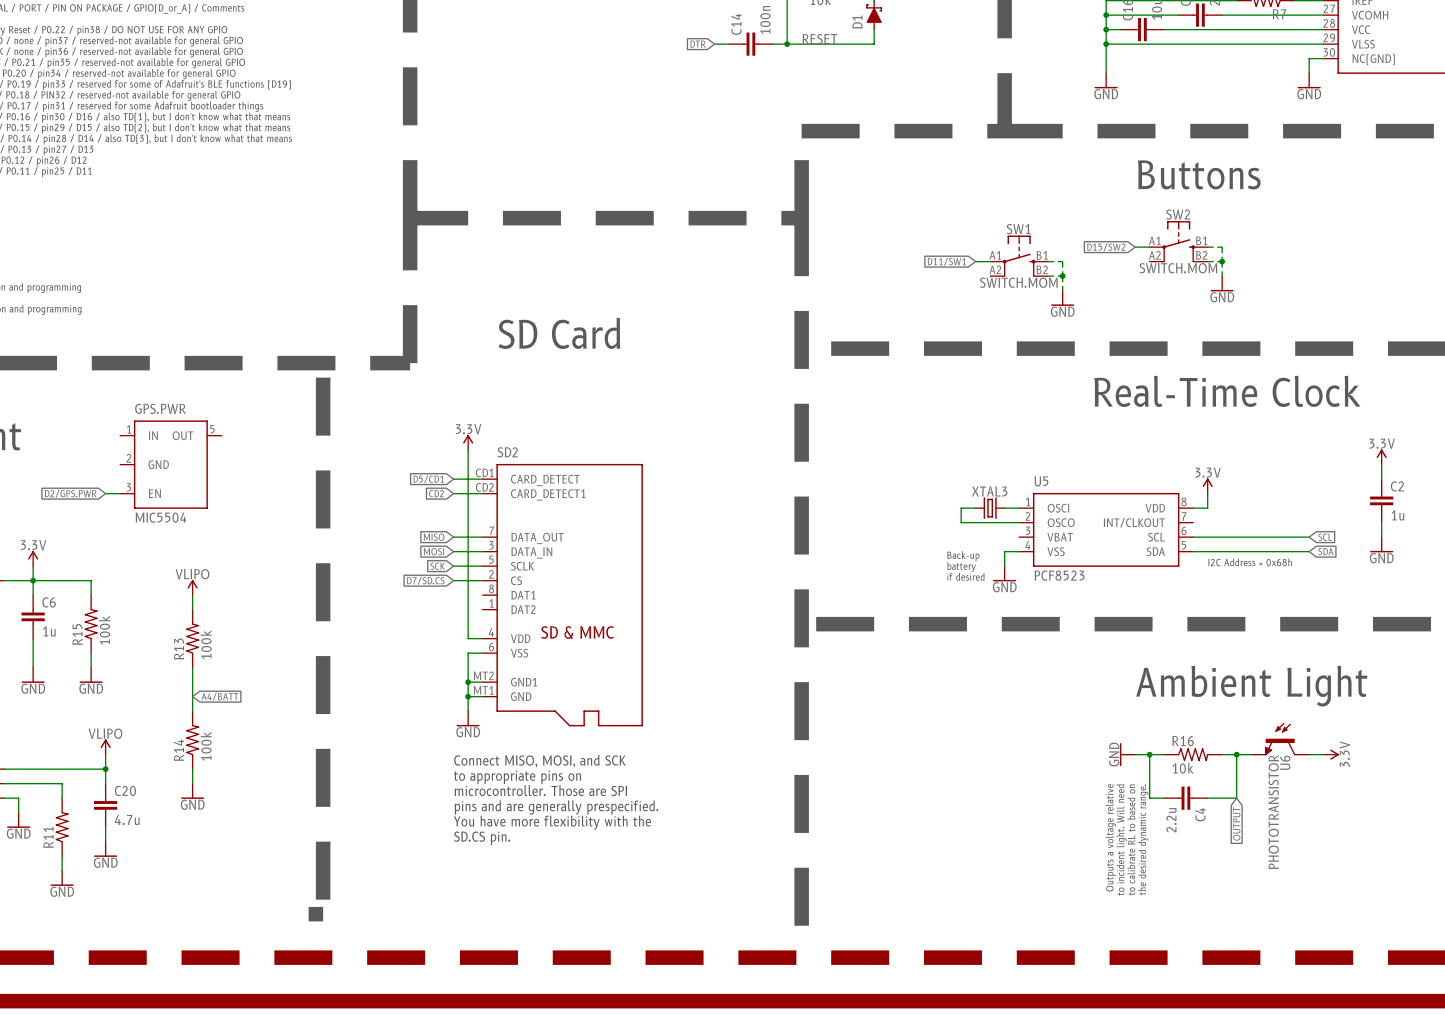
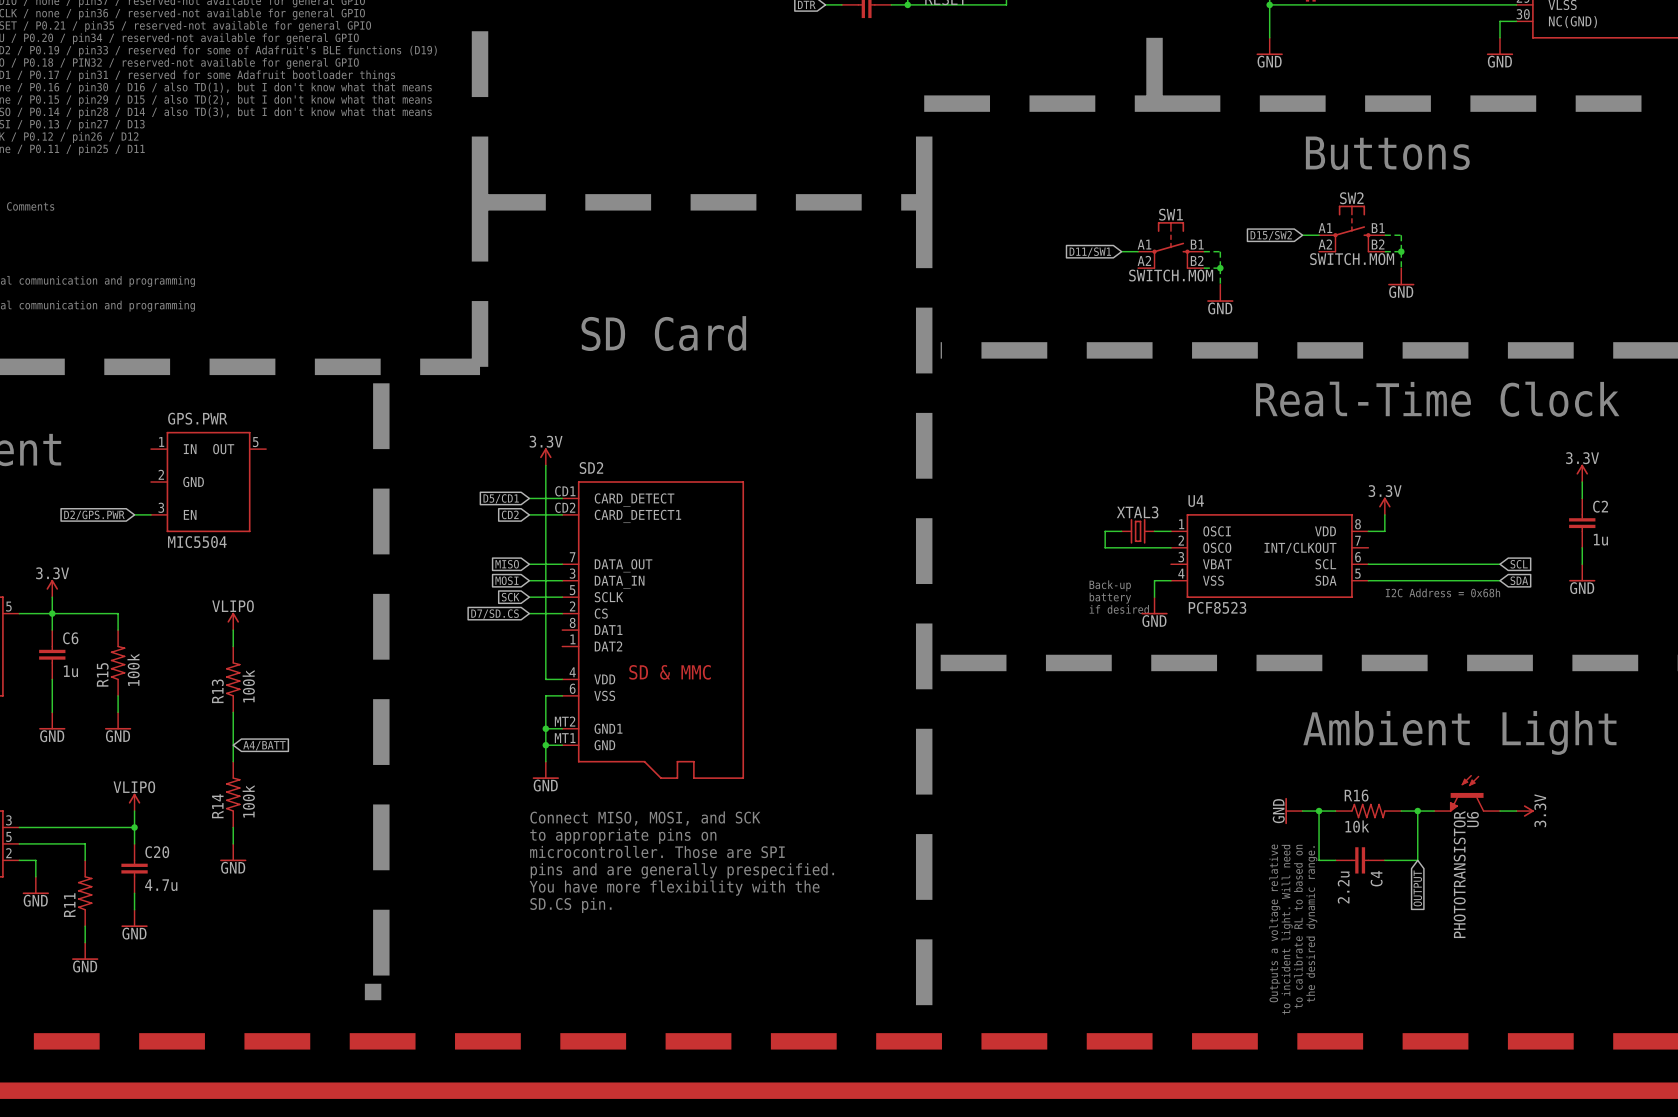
U5 name: U5 (1041, 481) -> U4 (1196, 501)

